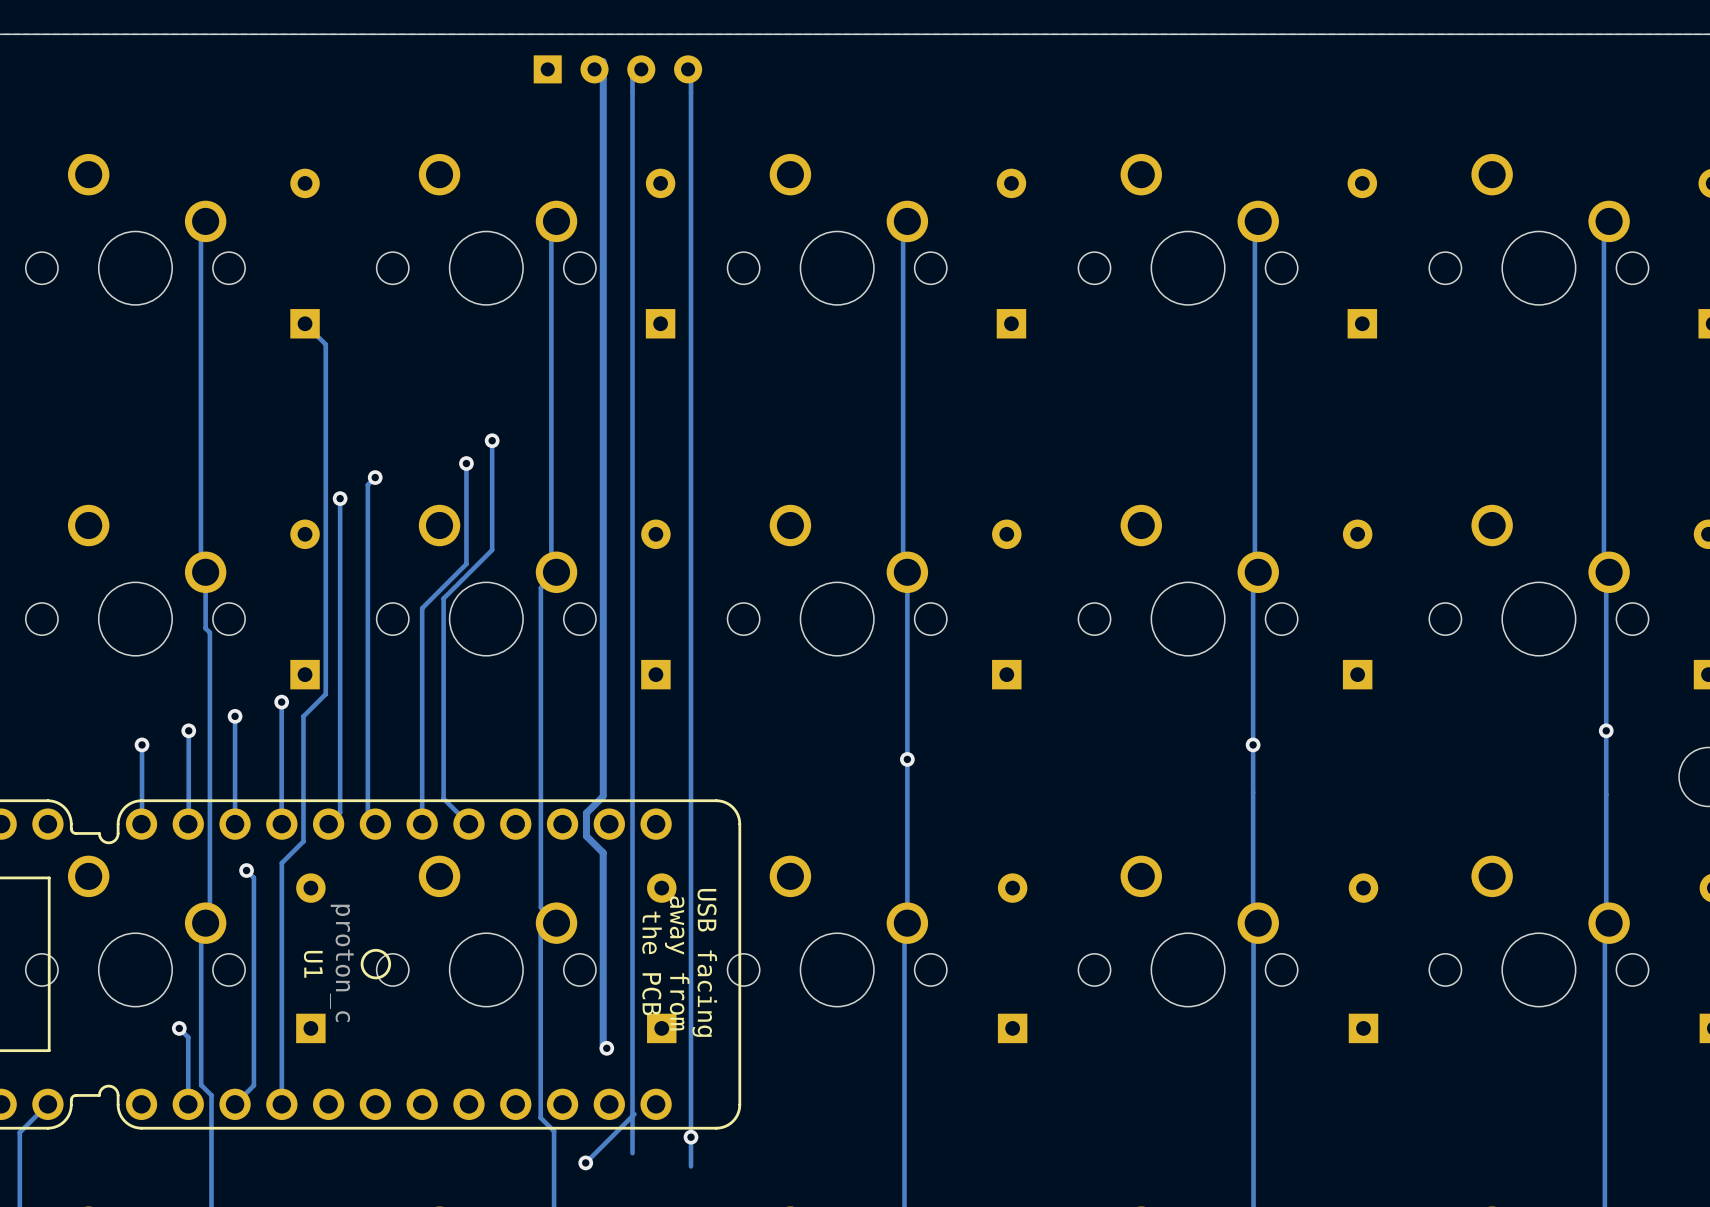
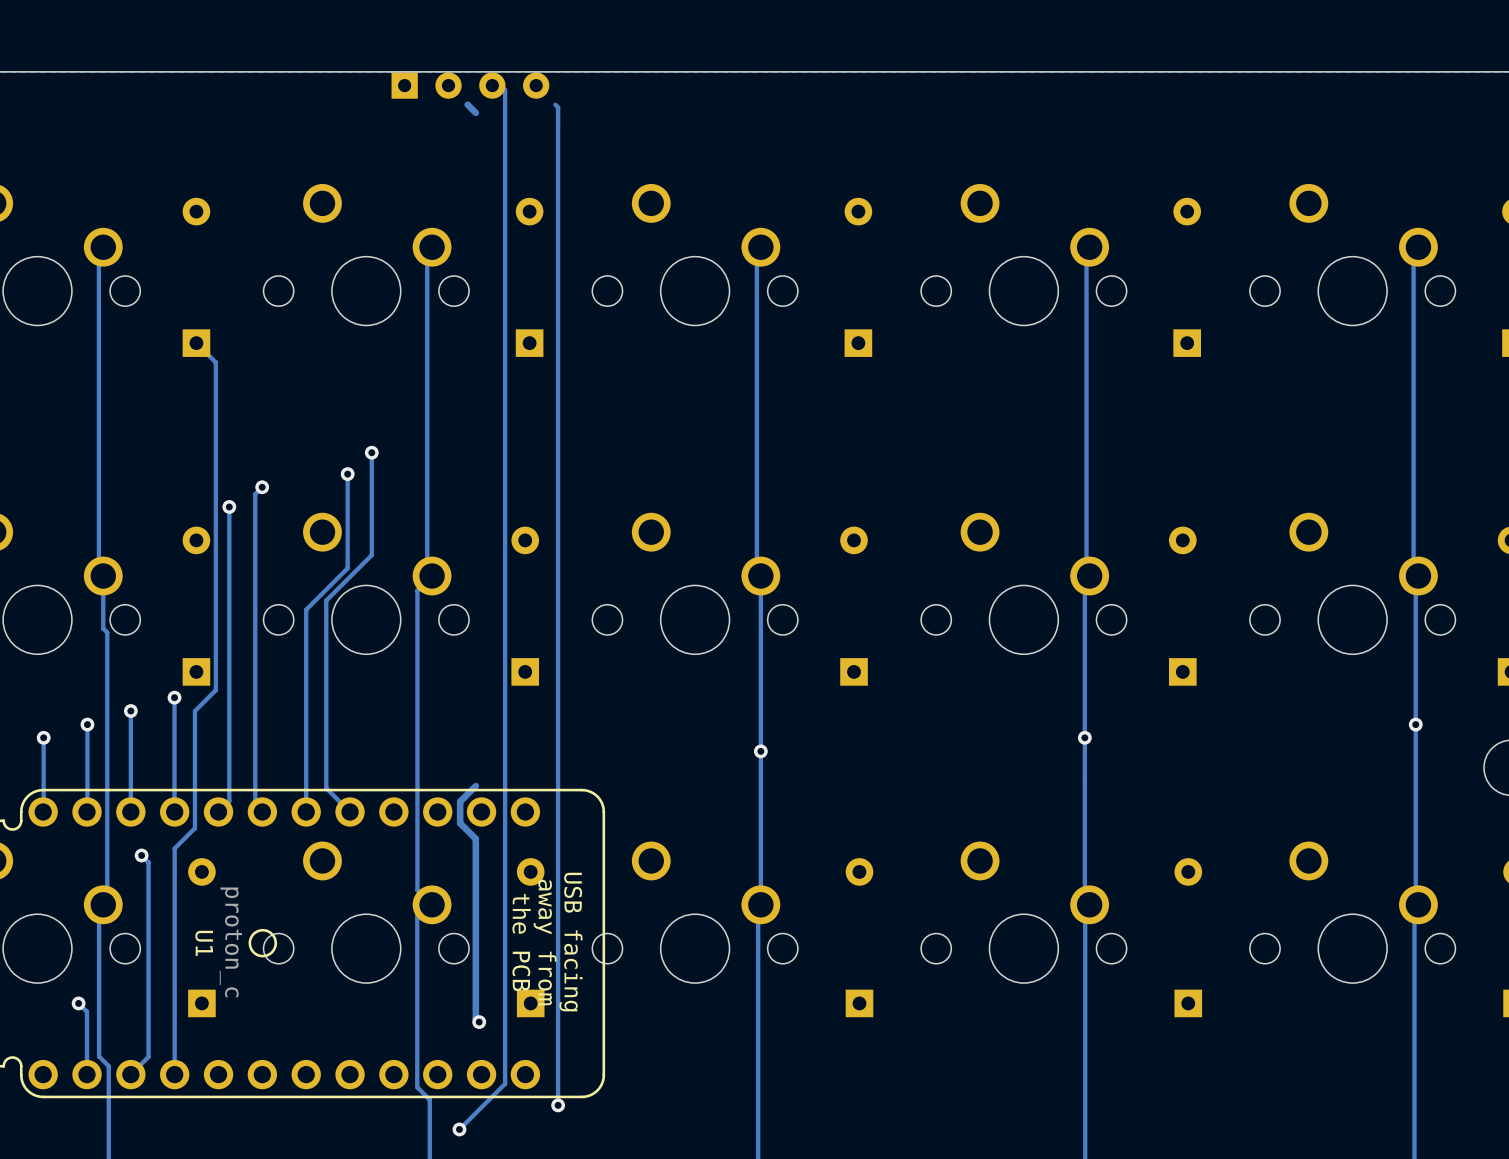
track: none -> (492, 77) (505, 90) (505, 1083)
track: (603, 61) (603, 794) -> none
part position: (617, 69) -> (470, 85)
track: (641, 69) (632, 78) (632, 1153) -> none
track: (691, 1137) (691, 1166) -> none

